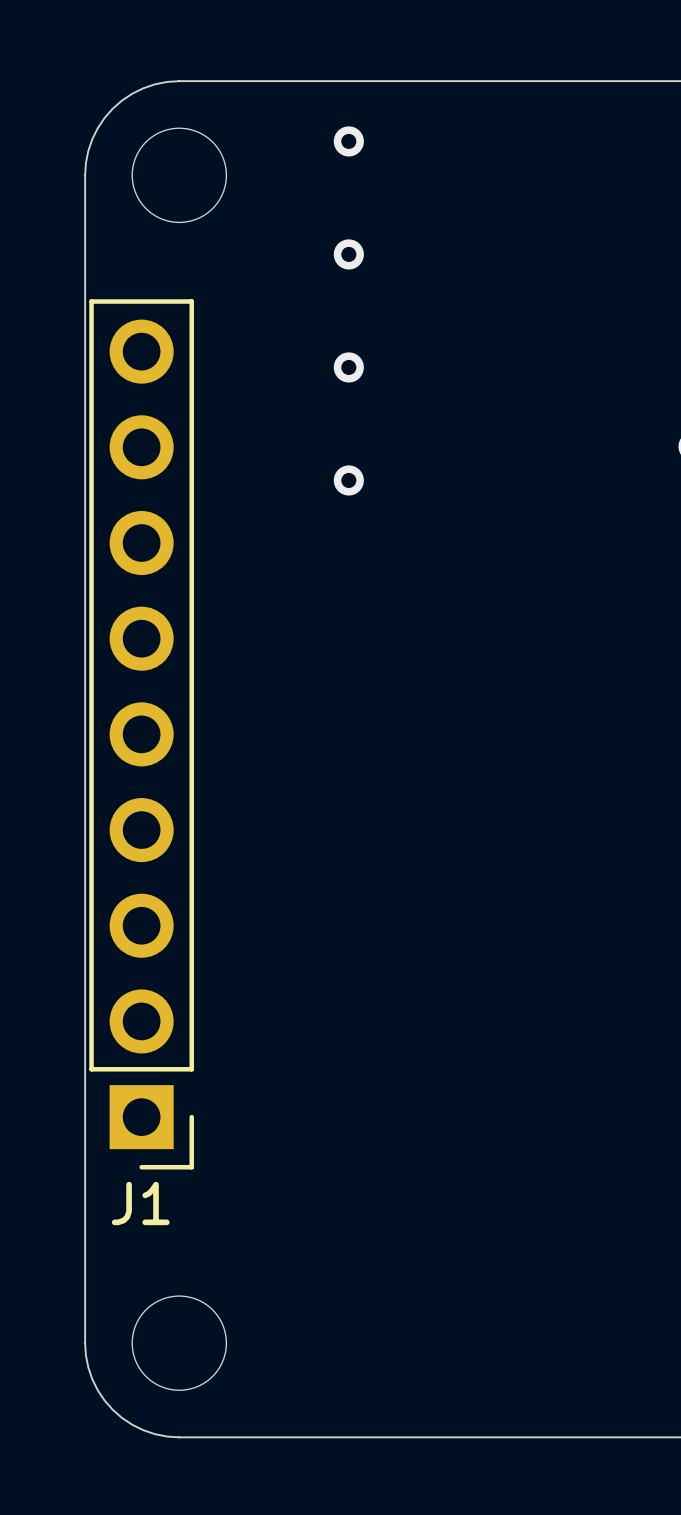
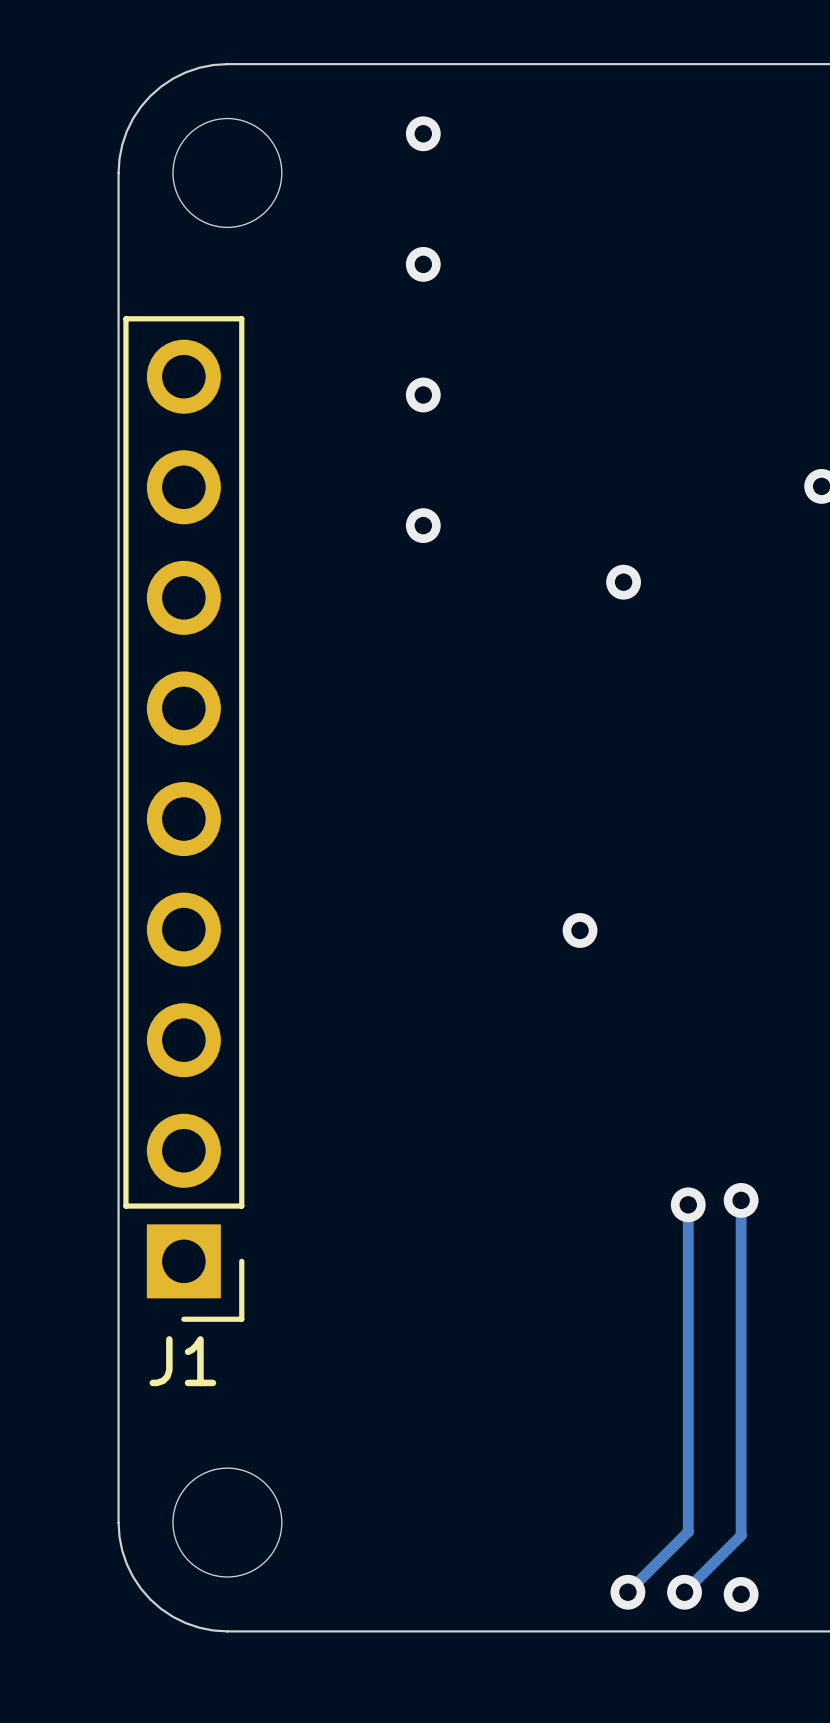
via: none -> (623, 582)
via: none -> (580, 930)
track: none -> (741, 1200) (741, 1535) (684, 1592)
via: none -> (741, 1200)
track: none -> (688, 1204) (688, 1531) (627, 1592)
via: none -> (688, 1204)
via: none -> (627, 1592)
via: none -> (684, 1592)
via: none -> (741, 1594)

